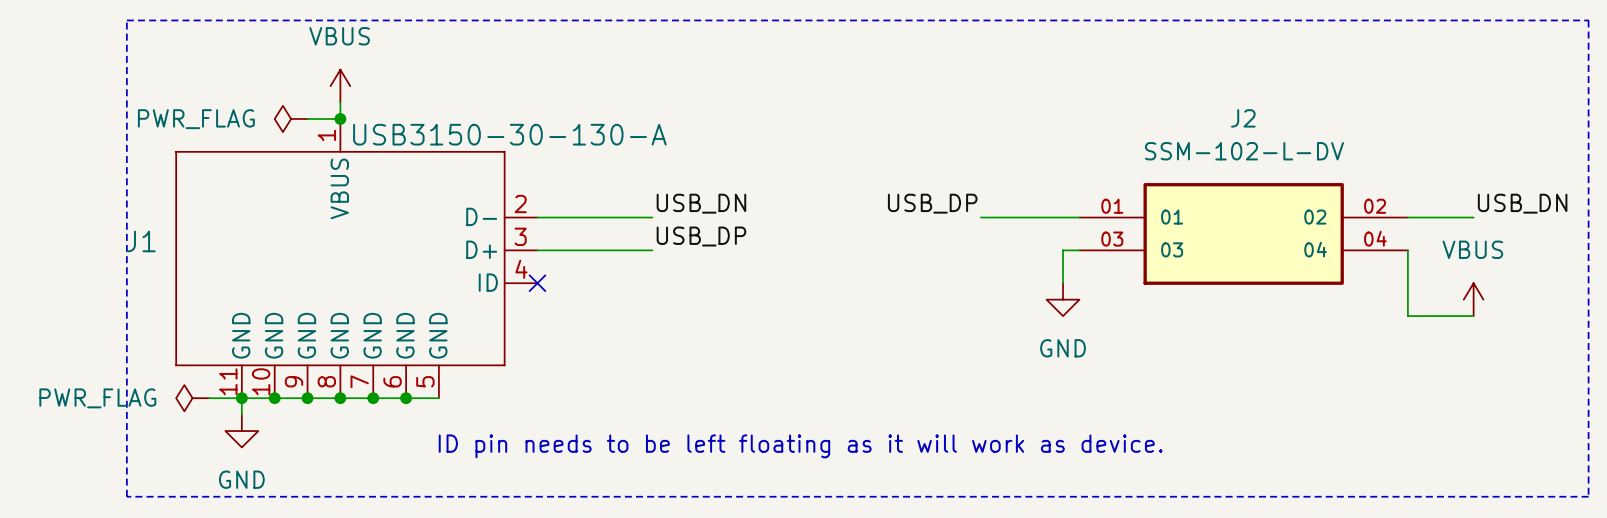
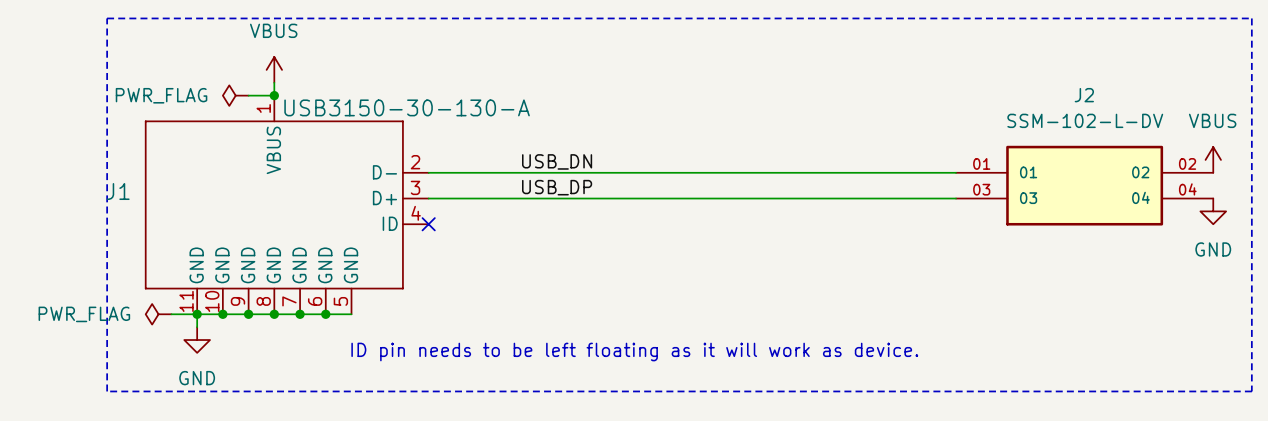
label: USB_DP (932, 203) -> none
label: USB_DN (1522, 203) -> none
wire: none -> (518, 172) (775, 172)
J2 position: (1243, 233) -> (1084, 185)
wire: (1063, 250) (1063, 283) -> (840, 198) (518, 198)
wire: (1407, 250) (1407, 316) (1473, 316) -> none
power symbol: none -> GND (1213, 211)
power symbol: GND (1063, 299) -> none
power symbol position: VBUS (1473, 299) -> VBUS (1213, 159)

